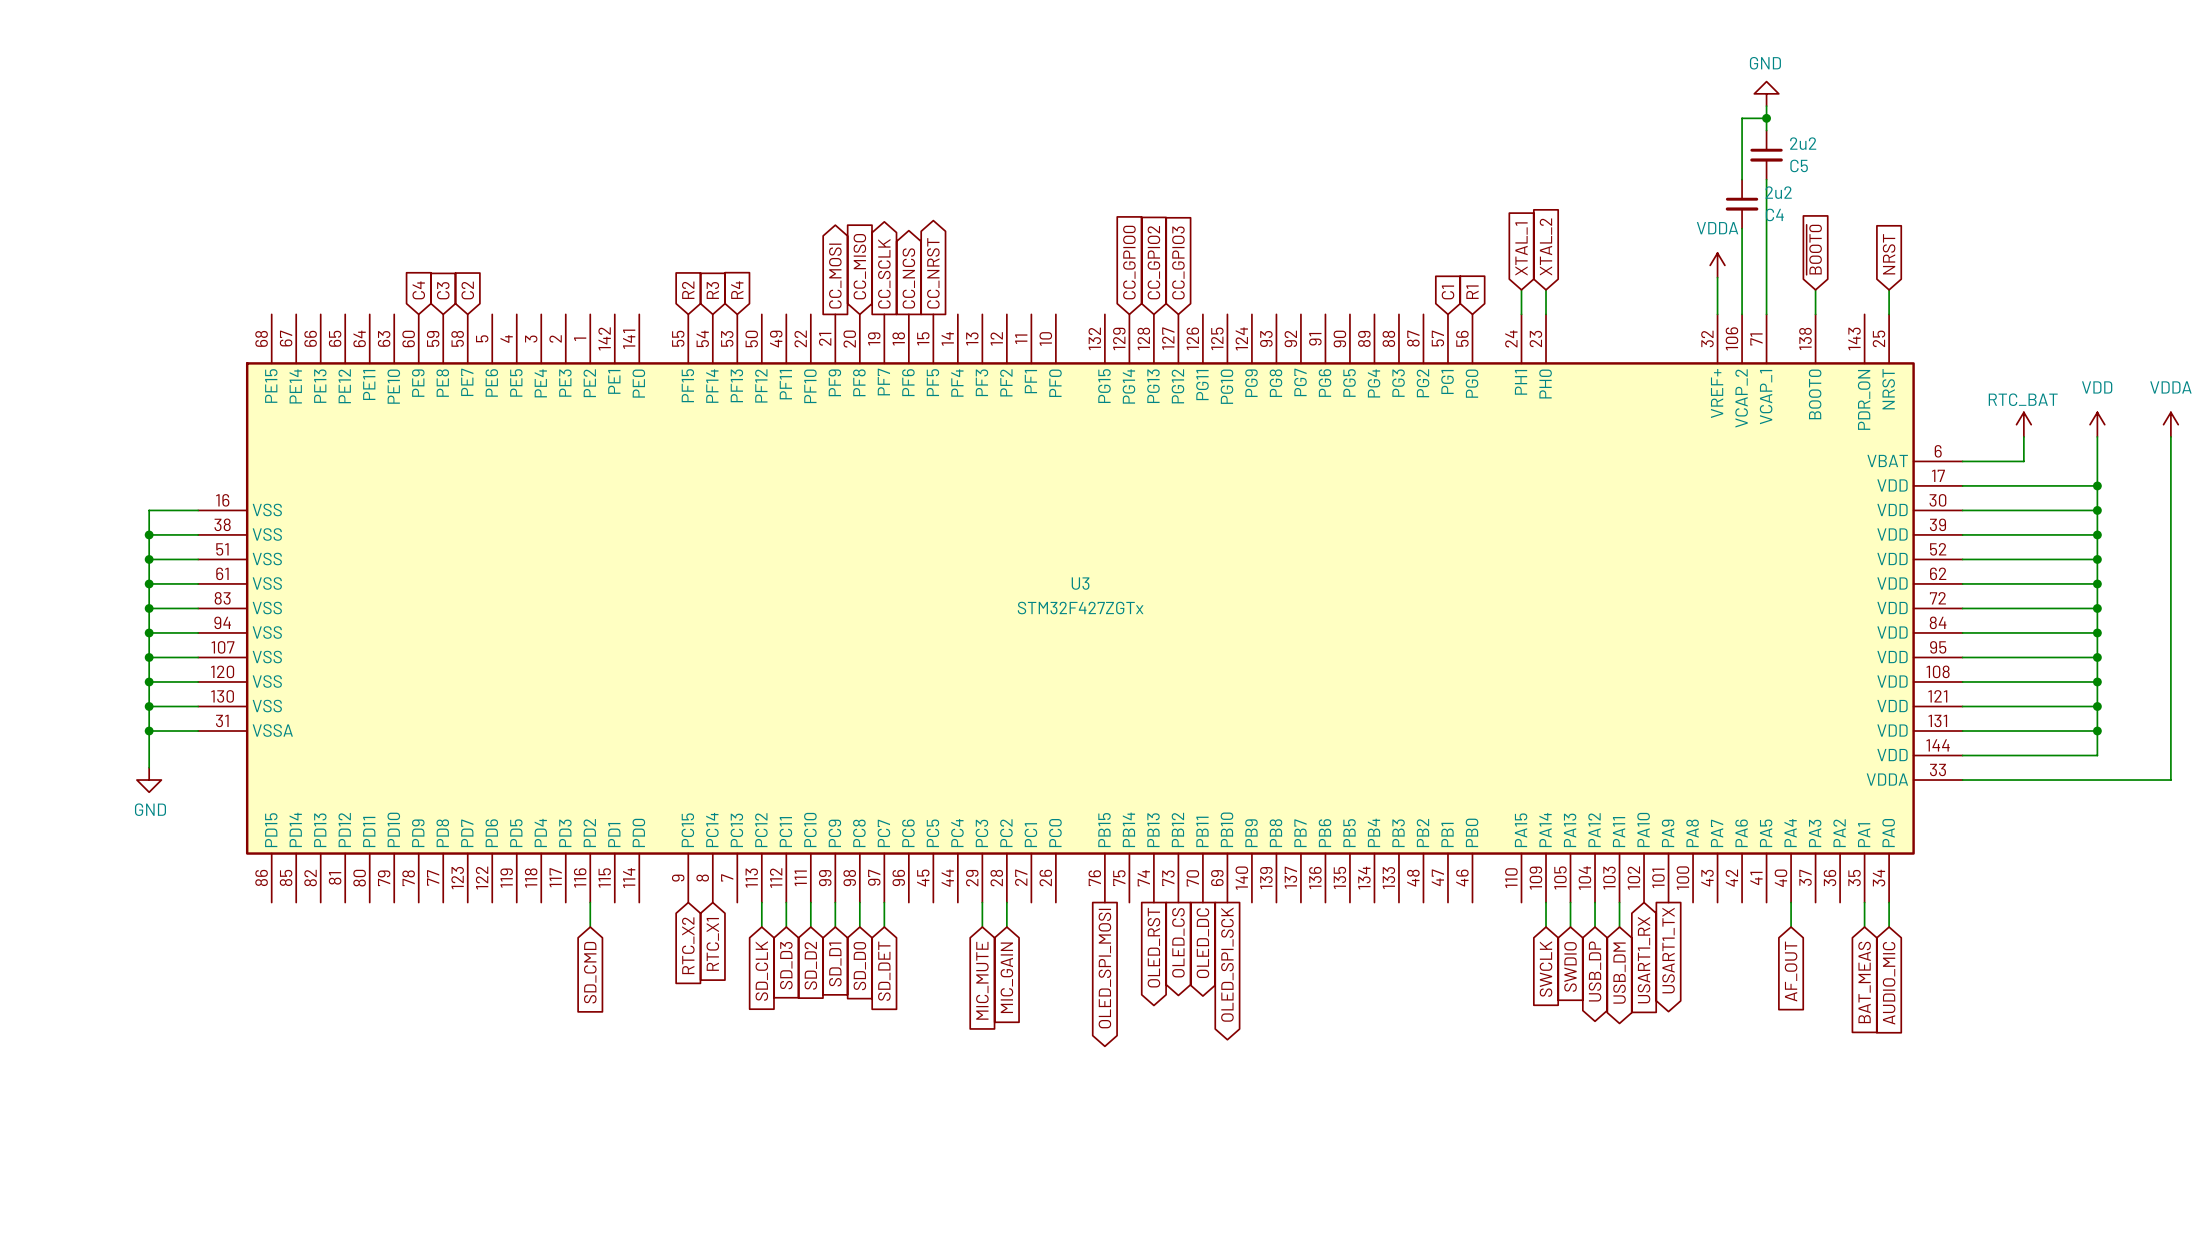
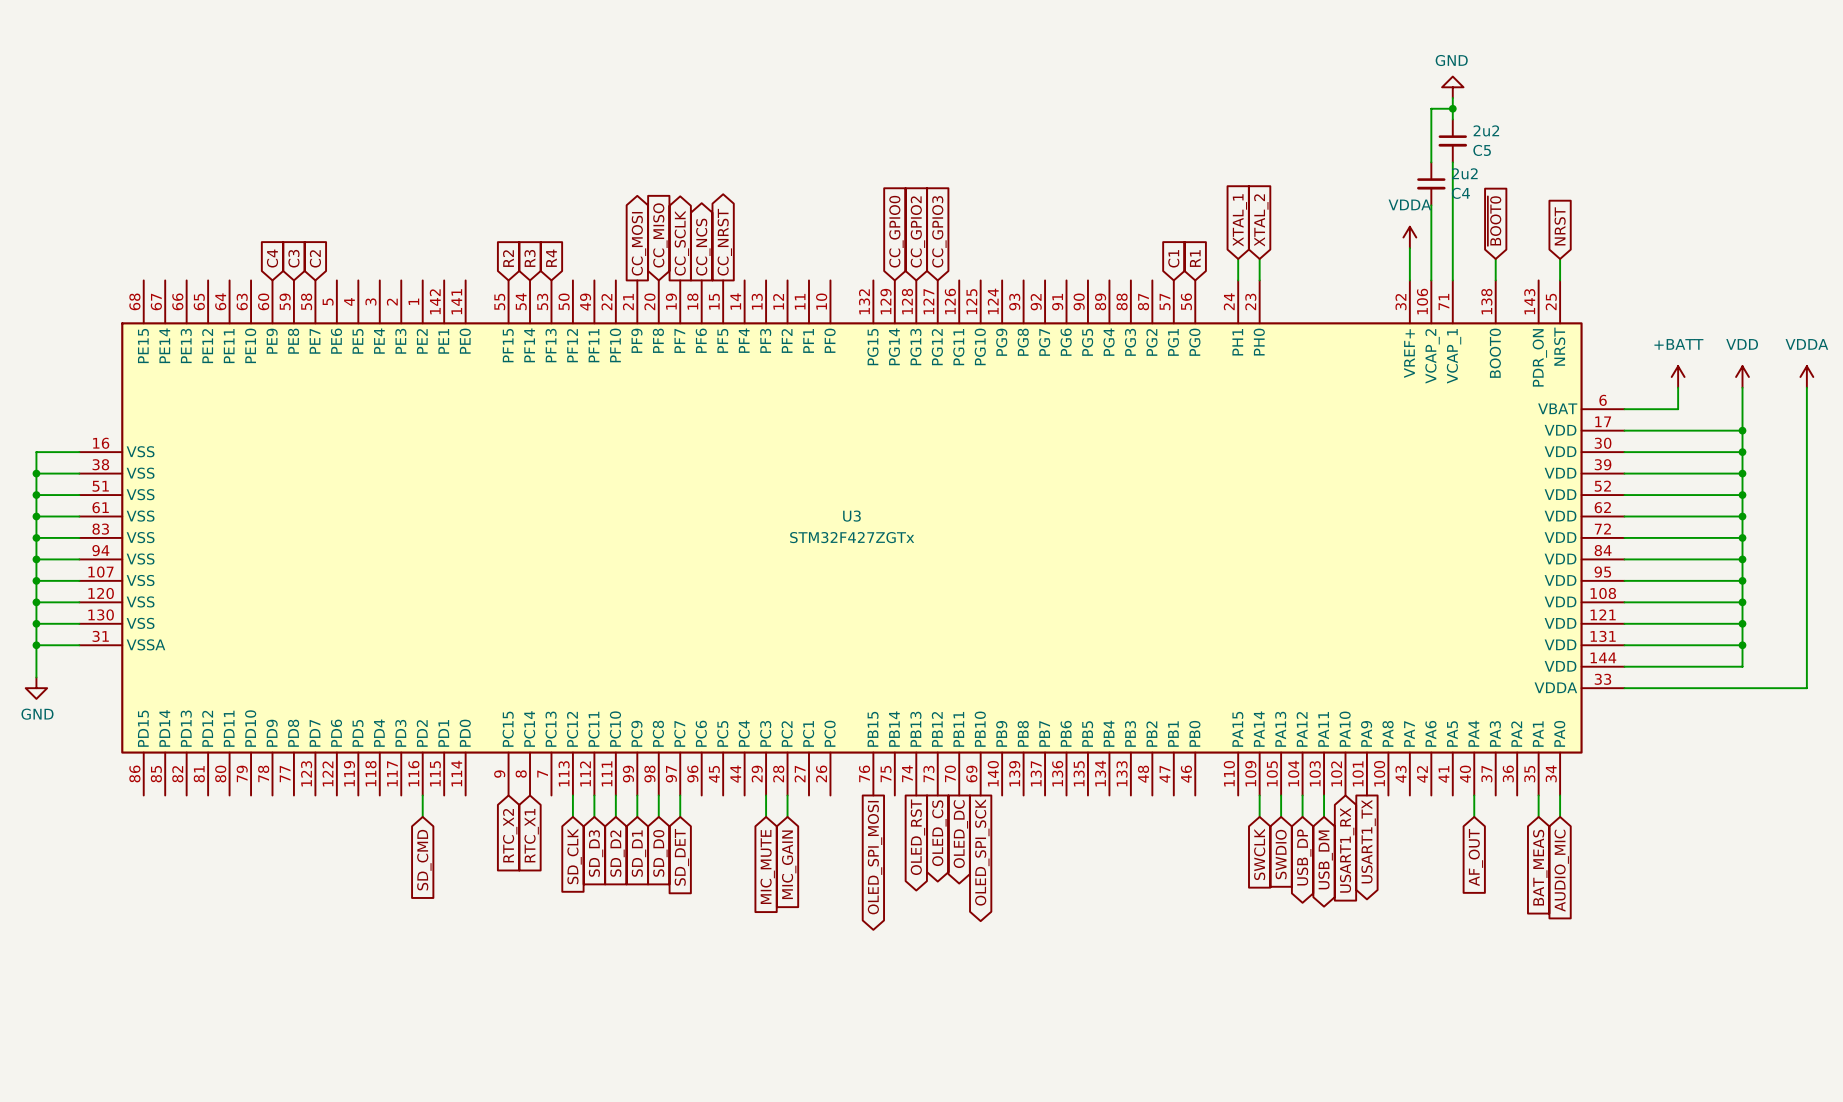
power symbol: RTC_BAT (2023, 424) -> +BATT (1678, 377)

